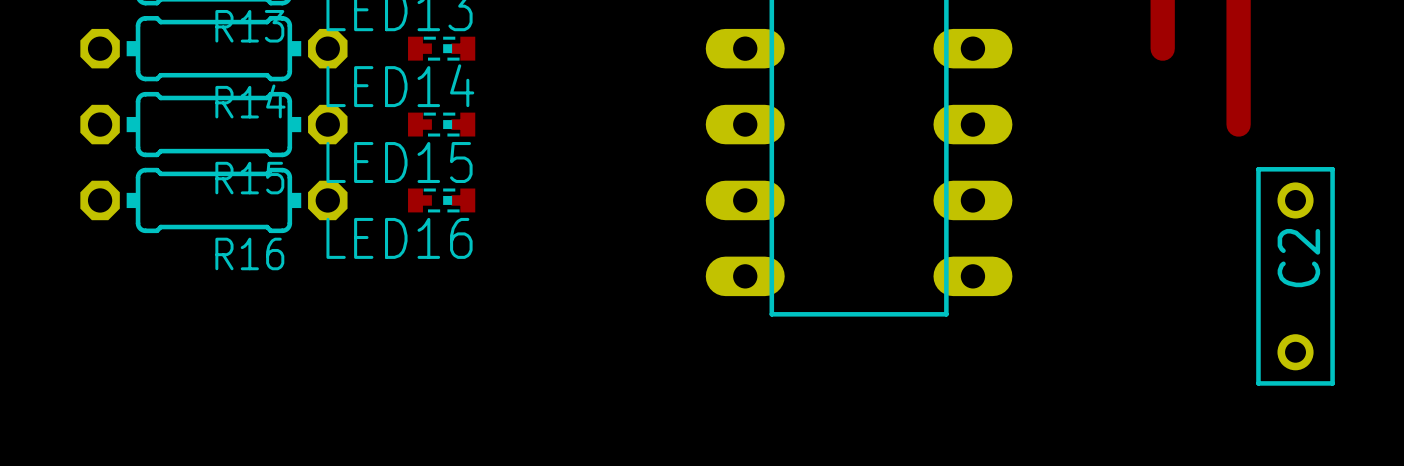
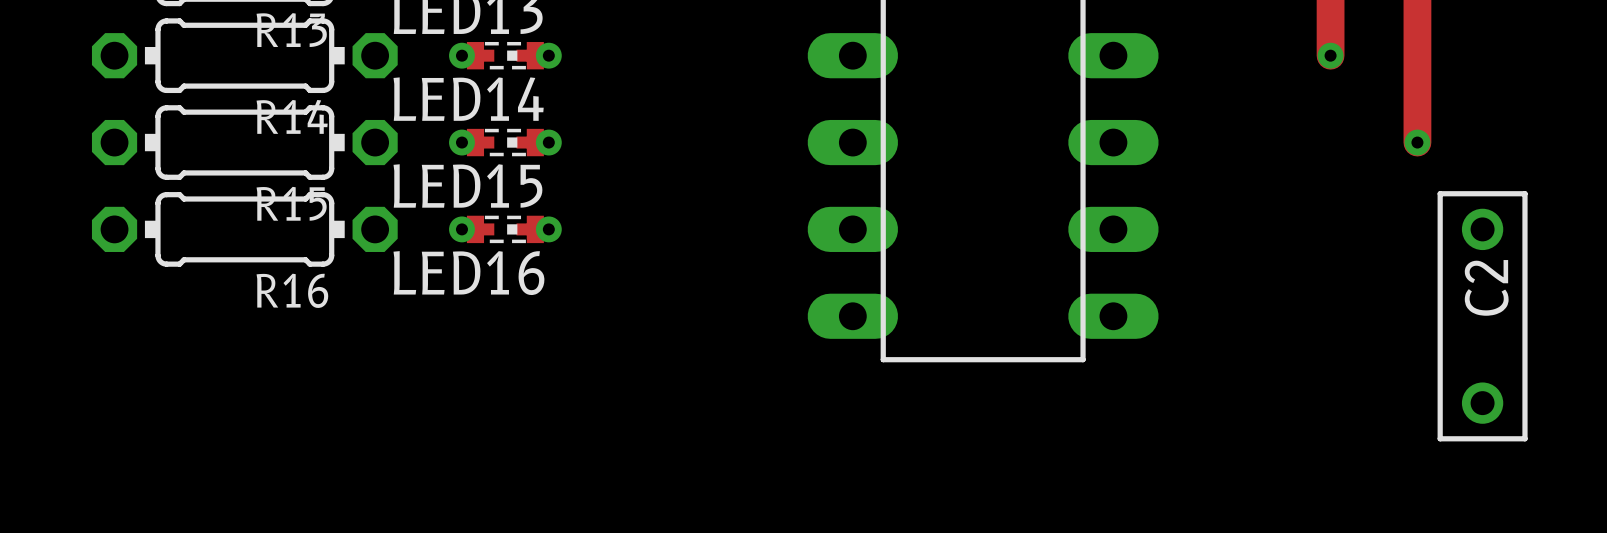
via: none -> (461, 55)
via: none -> (548, 55)
via: none -> (1330, 55)
via: none -> (461, 142)
via: none -> (548, 142)
via: none -> (1417, 142)
via: none -> (461, 229)
via: none -> (548, 229)

